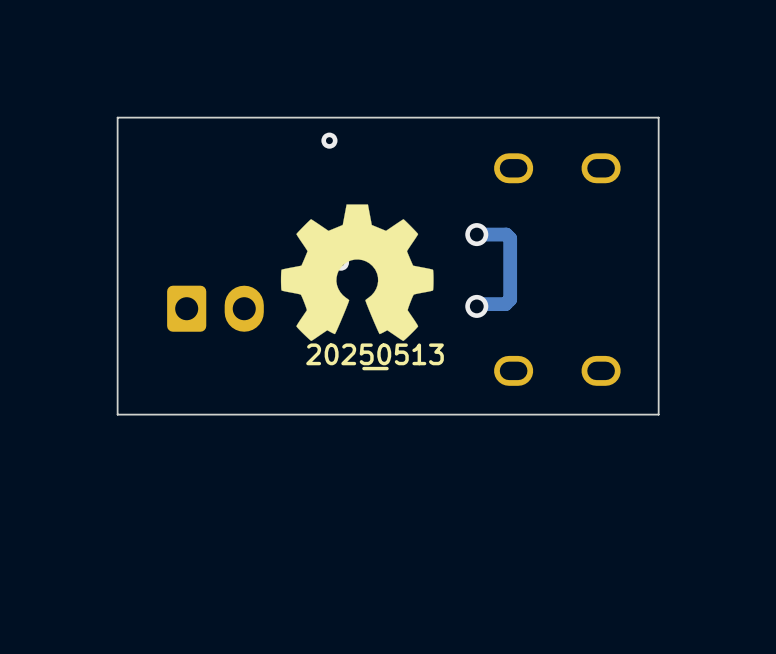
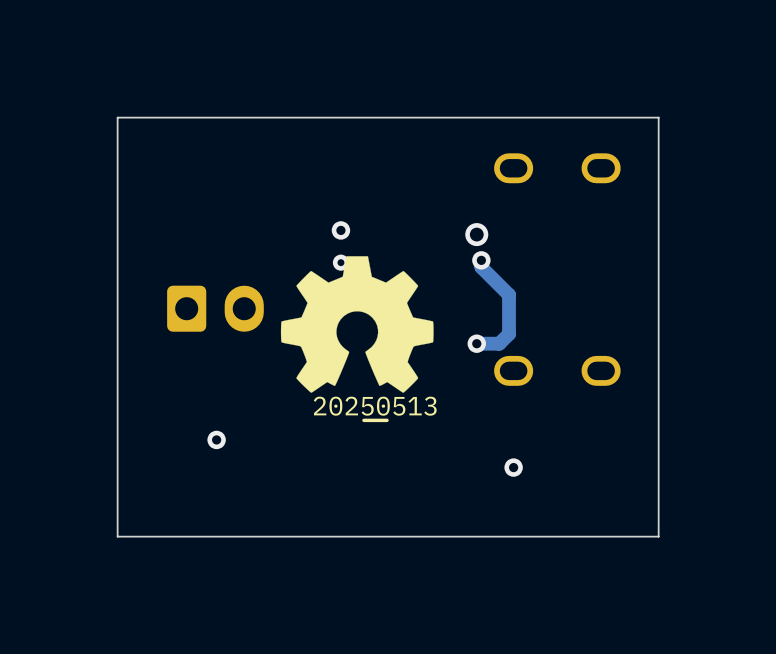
via: (329, 140) -> none
via: none -> (340, 230)
track: (476, 234) (506, 234) (510, 238) (510, 299) (505, 304) (479, 304) (476, 306) -> none
track: none -> (481, 260) (481, 267) (509, 294) (509, 334) (499, 343) (476, 343)
via: none -> (481, 260)
drawing position: (357, 272) -> (357, 324)
via: (476, 306) -> none
via: none -> (476, 343)
drawing position: (375, 368) -> (375, 420)
board edge: (658, 414) (117, 414) -> (658, 414) (658, 536) (117, 536) (117, 414)
via: none -> (216, 439)
via: none -> (513, 467)

